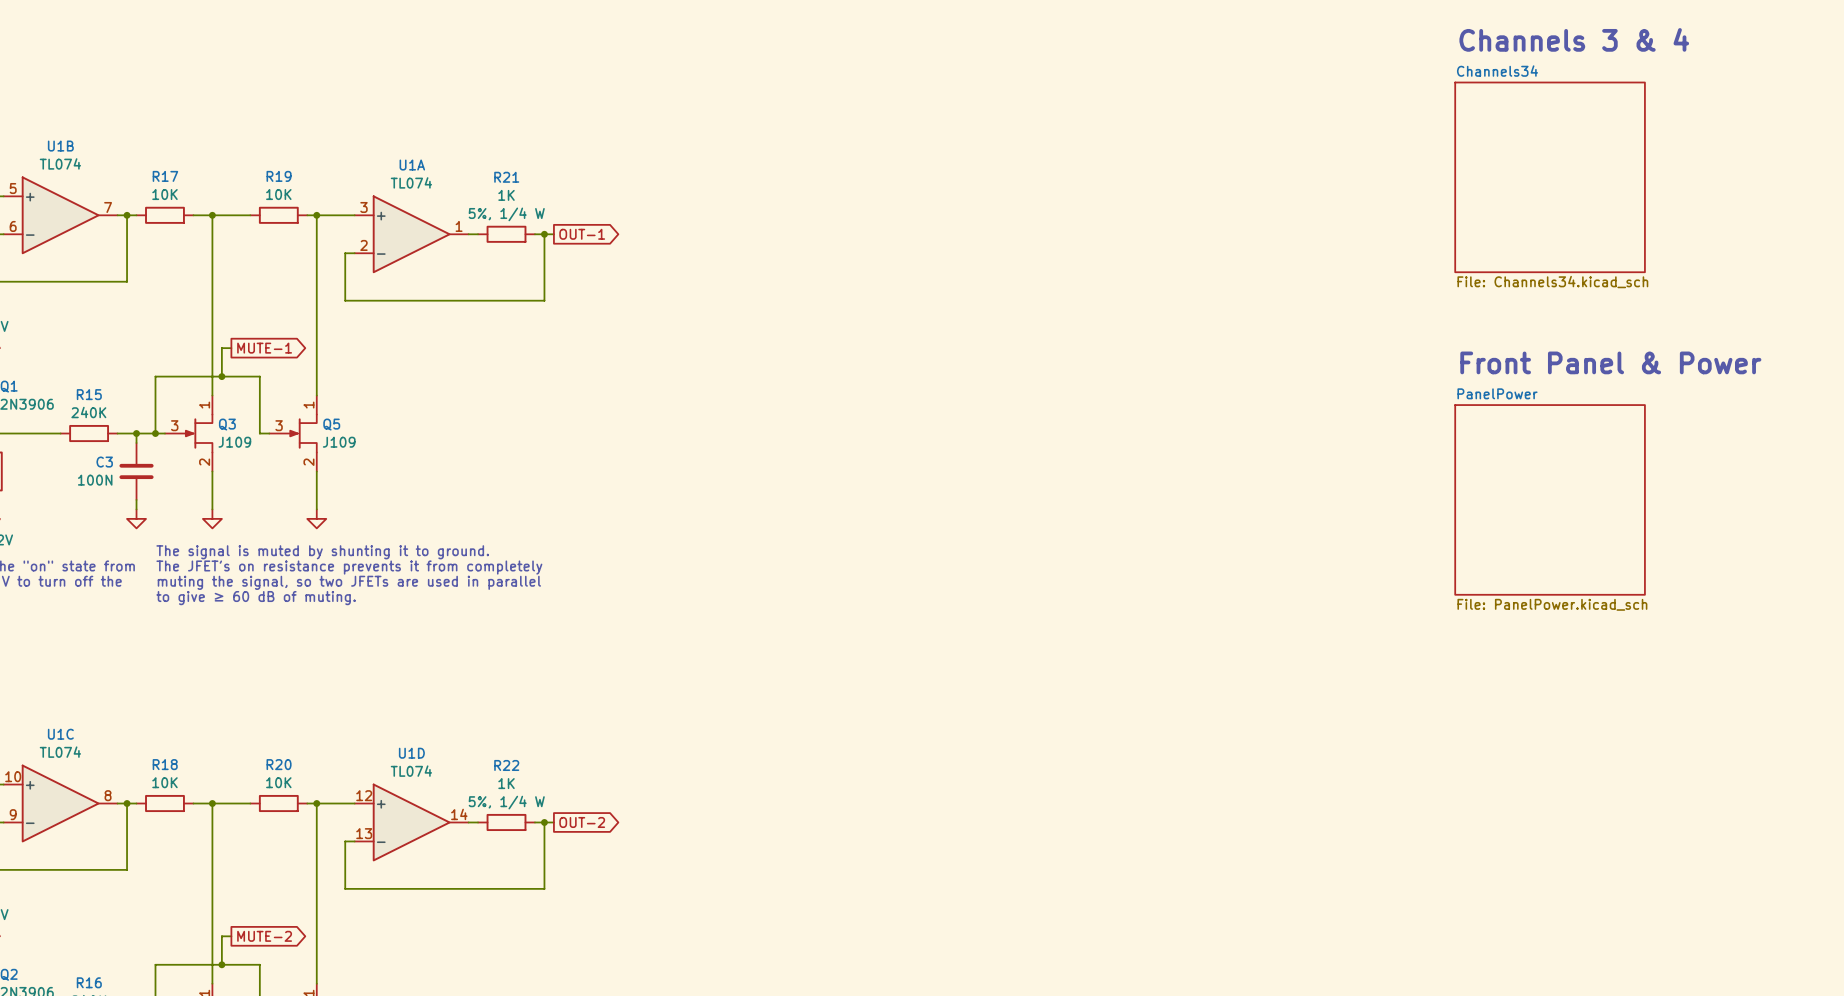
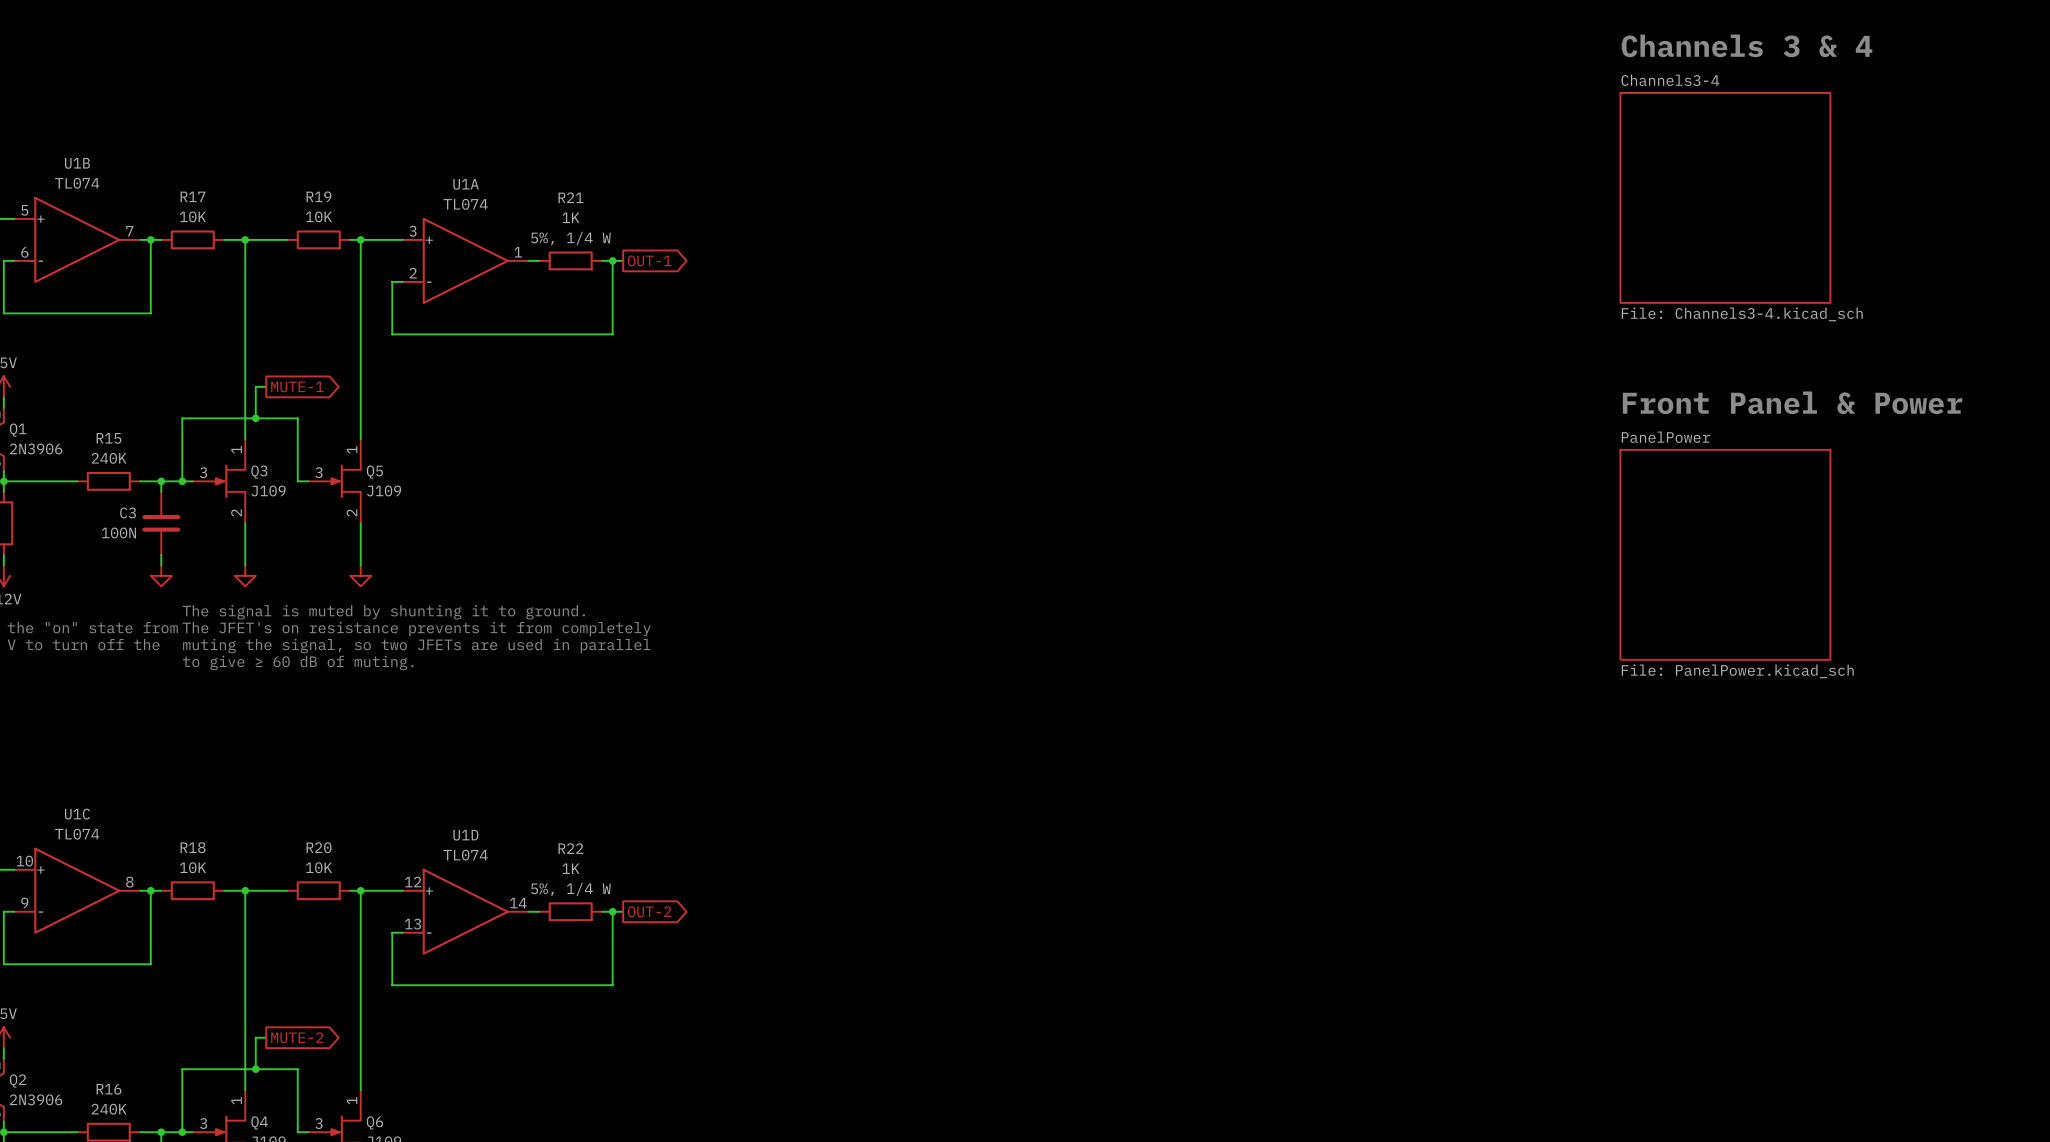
sheet Channels34 name: Channels34 (1497, 71) -> Channels3-4 (1670, 80)
sheet Channels34 value: File: Channels34.kicad_sch (1552, 282) -> File: Channels3-4.kicad_sch (1742, 314)

